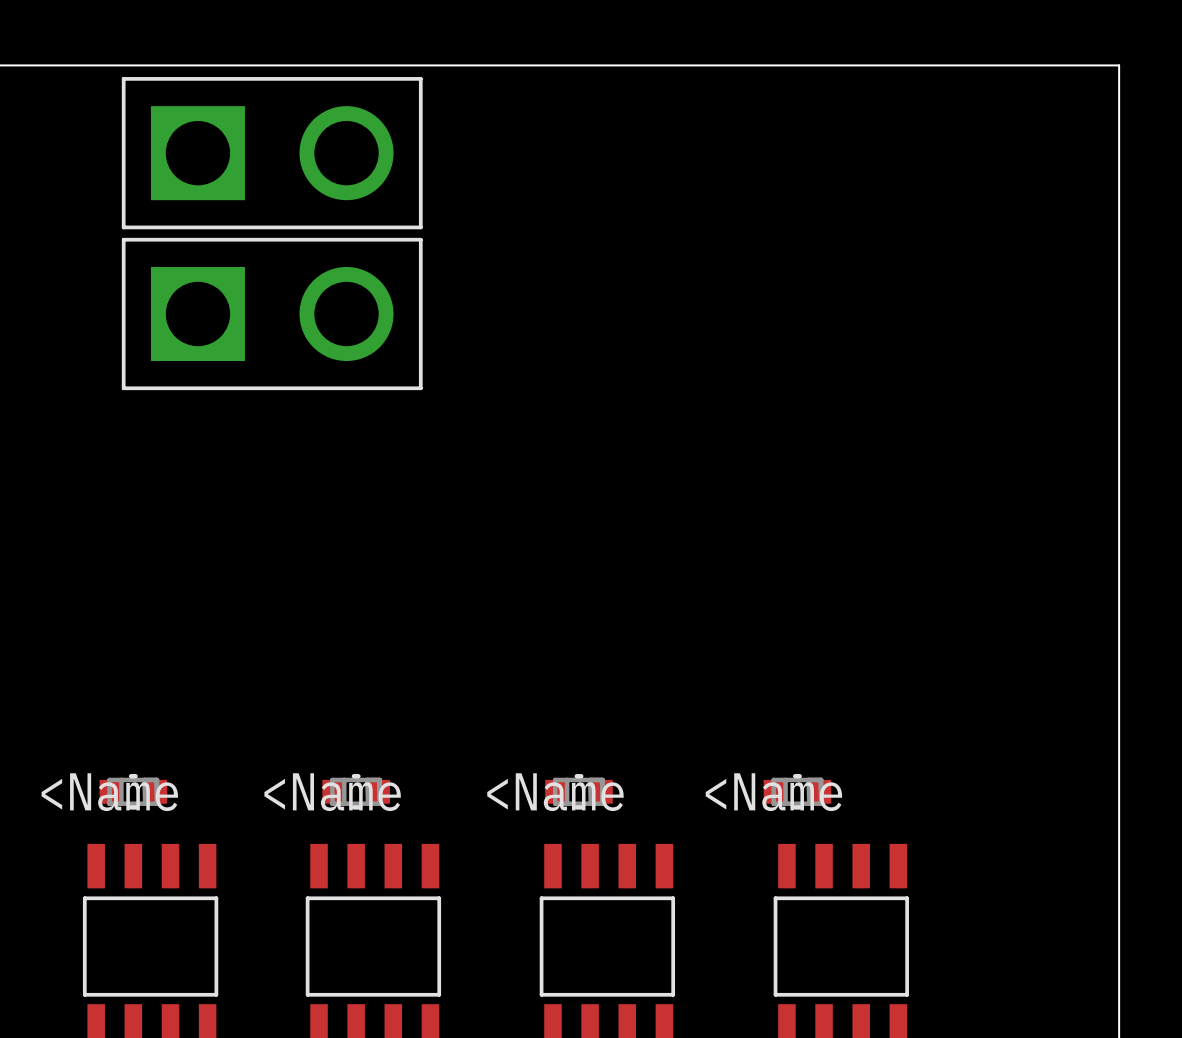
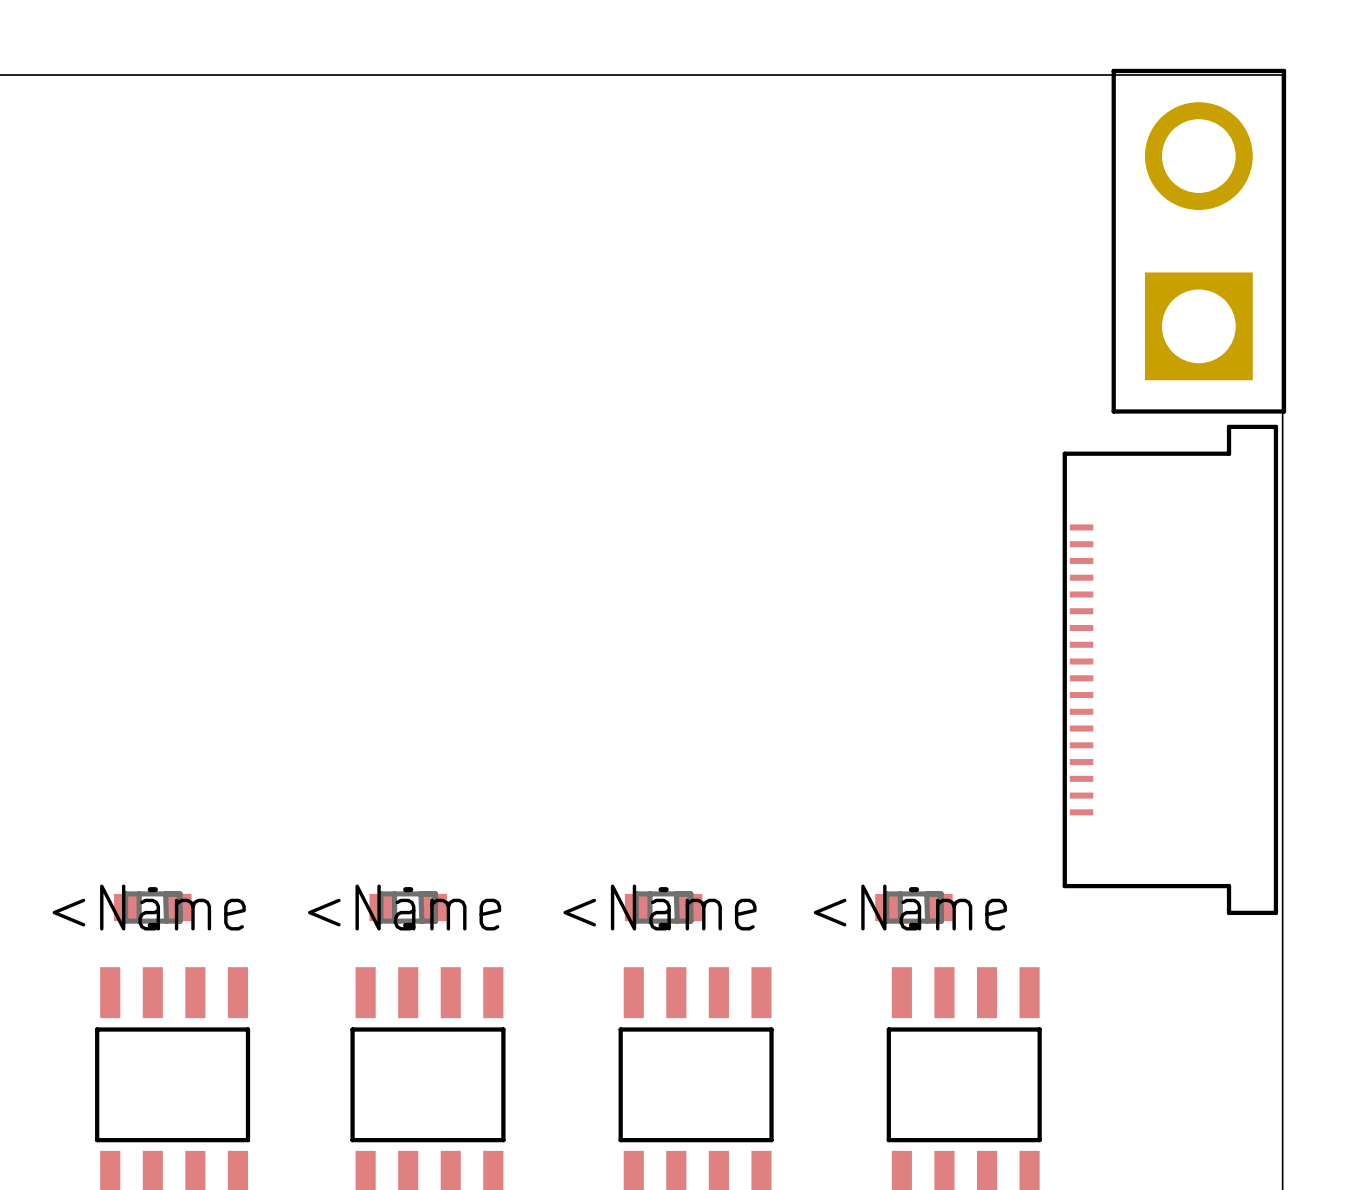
part: (272, 153) -> none
part: none -> (1198, 241)
part: (272, 313) -> none
part: none -> (1170, 669)

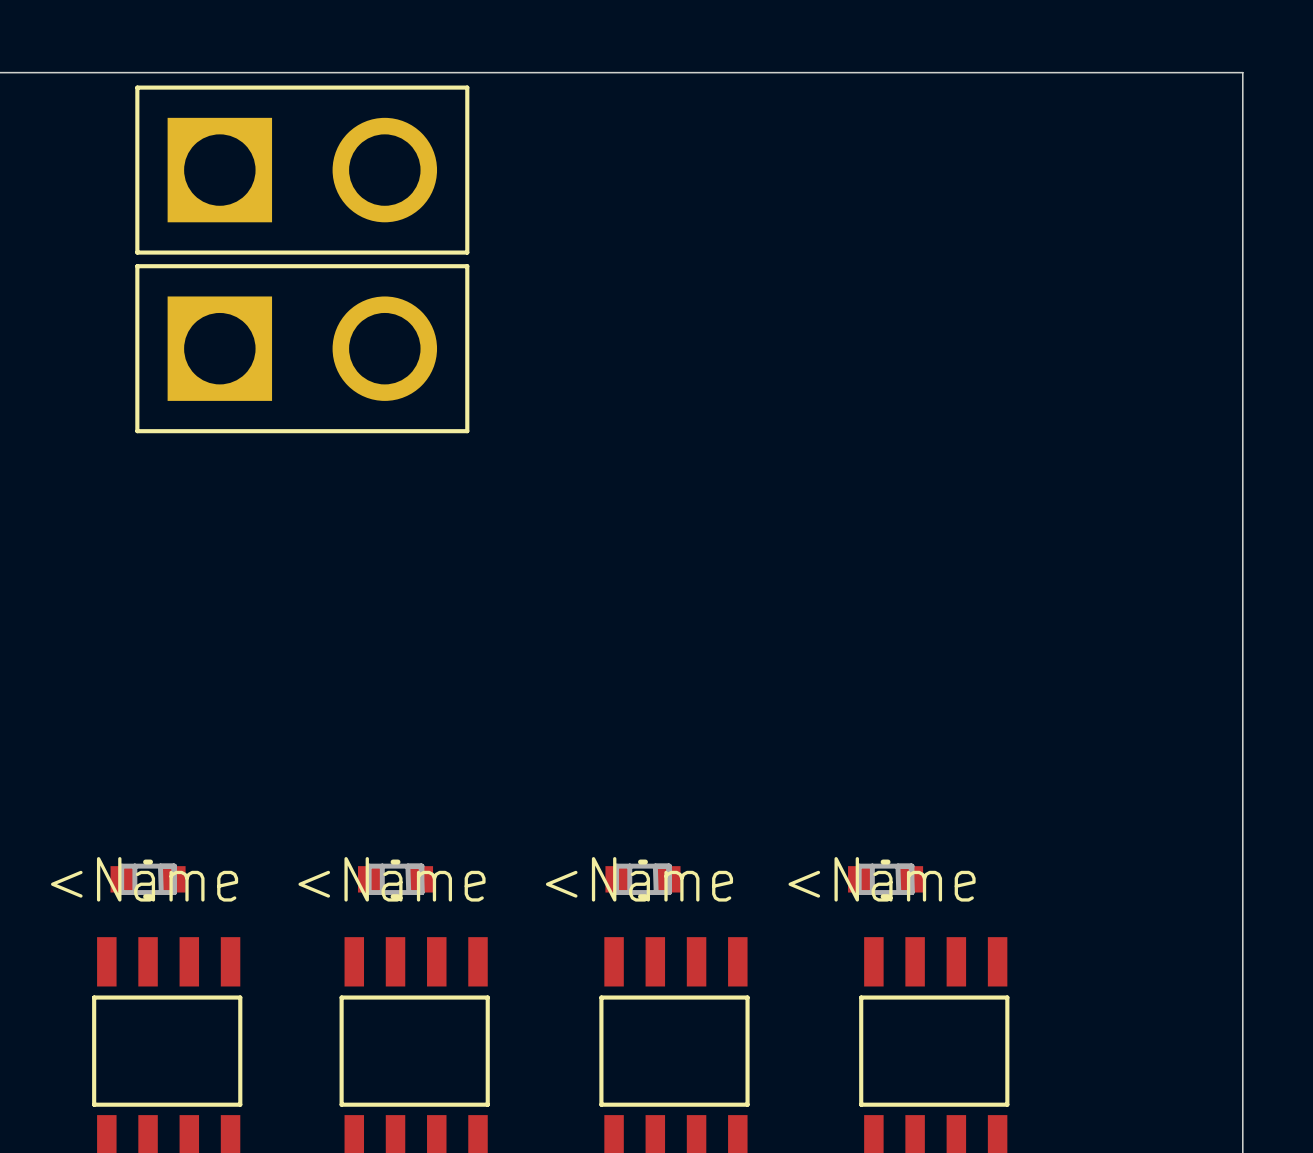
part: none -> (302, 170)
part: (1198, 241) -> none
part: none -> (302, 348)
part: (1170, 669) -> none

